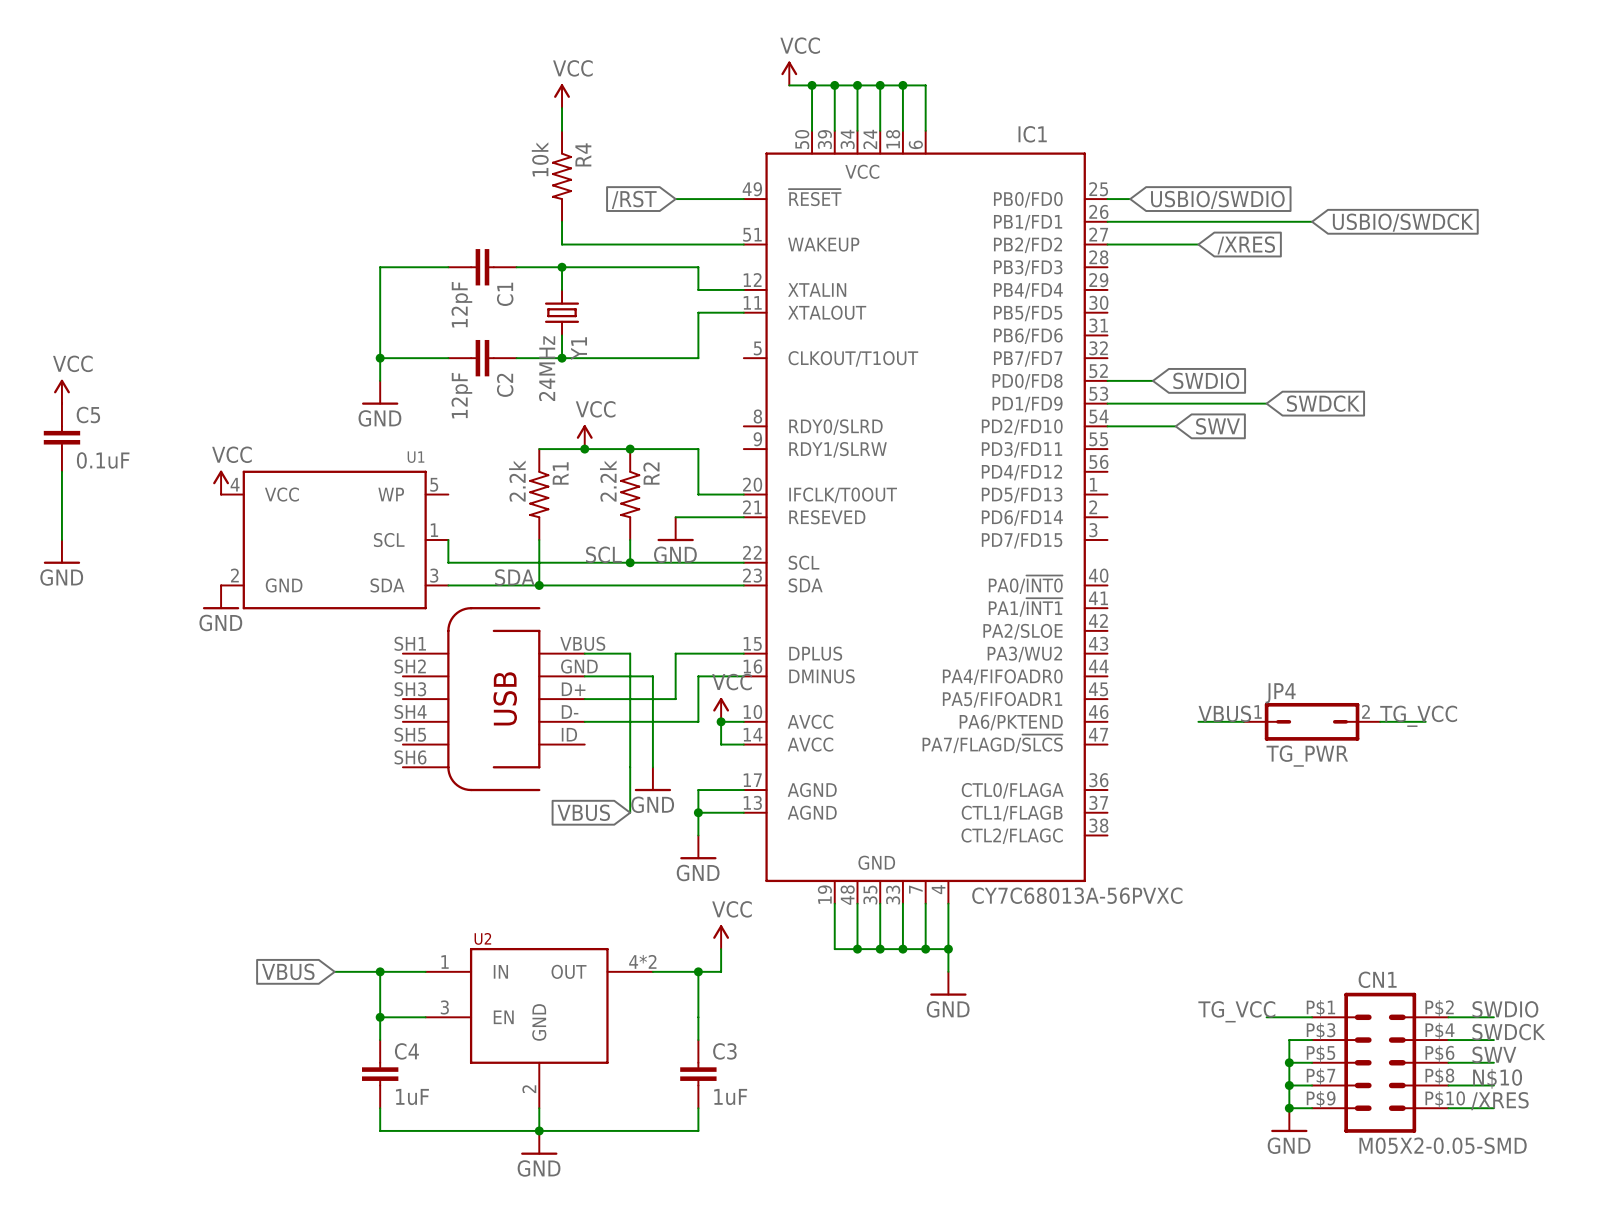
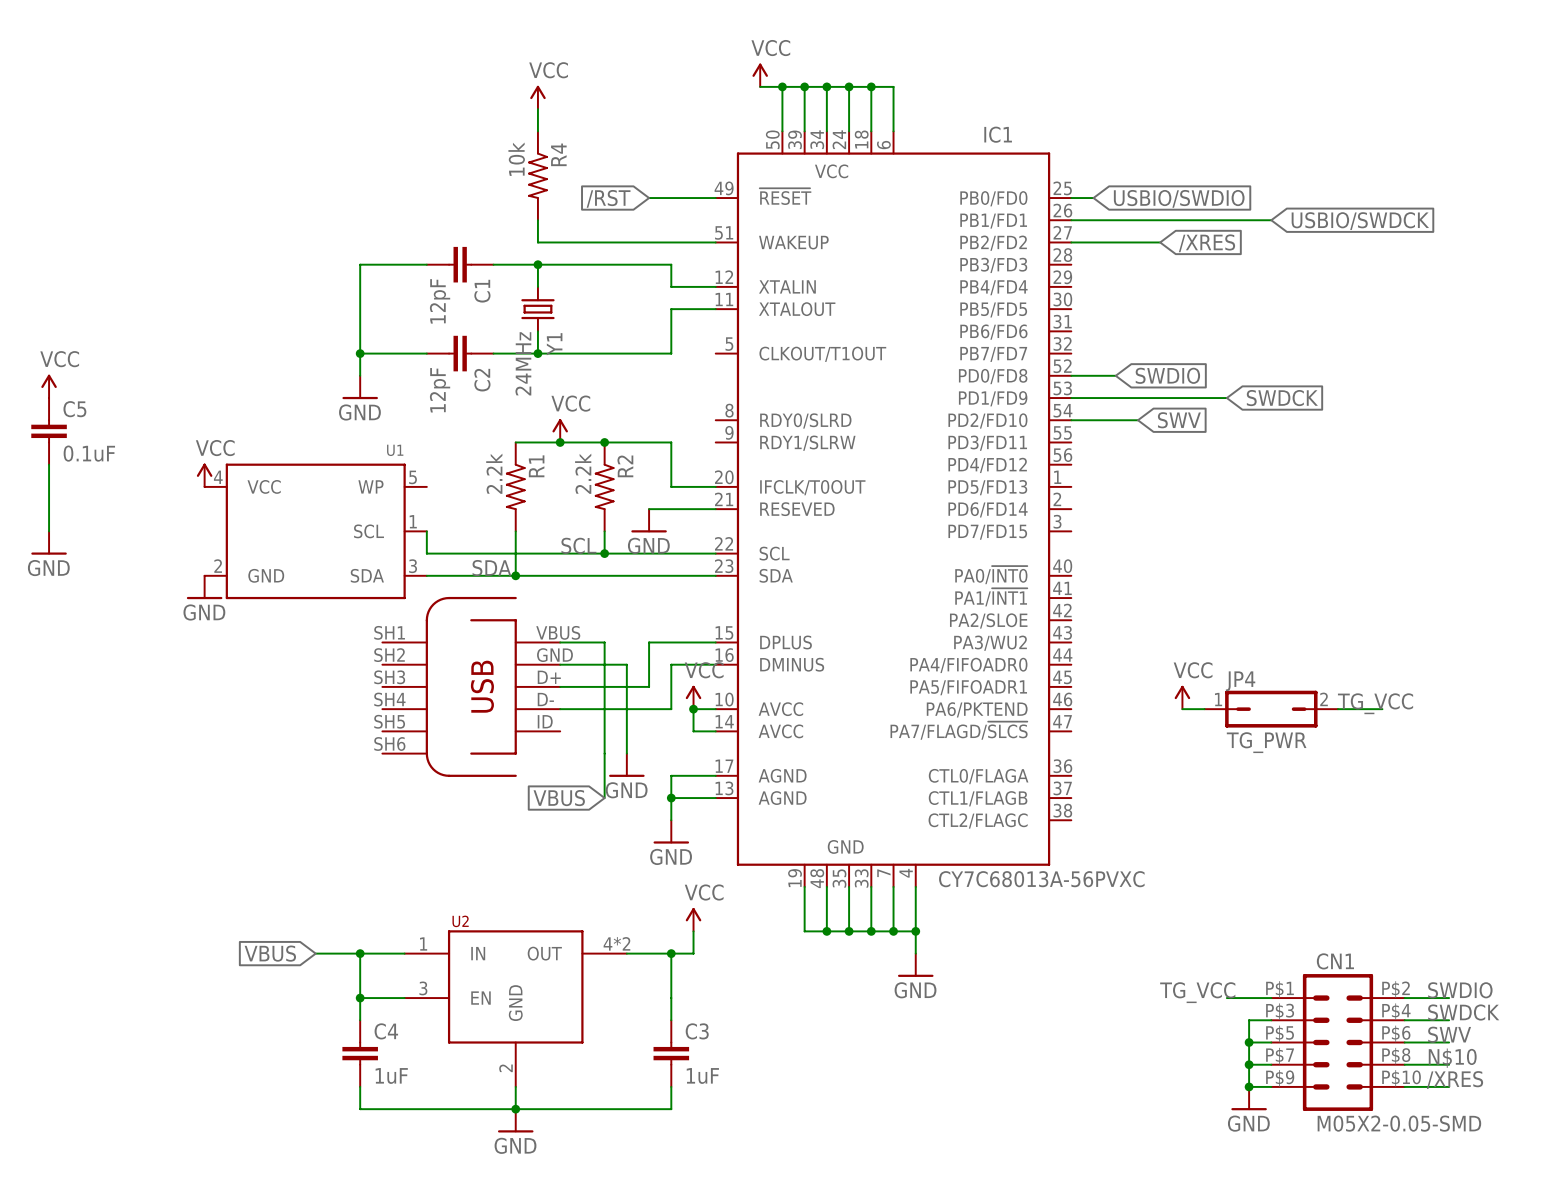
power symbol: none -> VCC (1182, 697)
label: VBUS (1224, 713) -> none
wire: (1198, 721) (1221, 721) -> none

